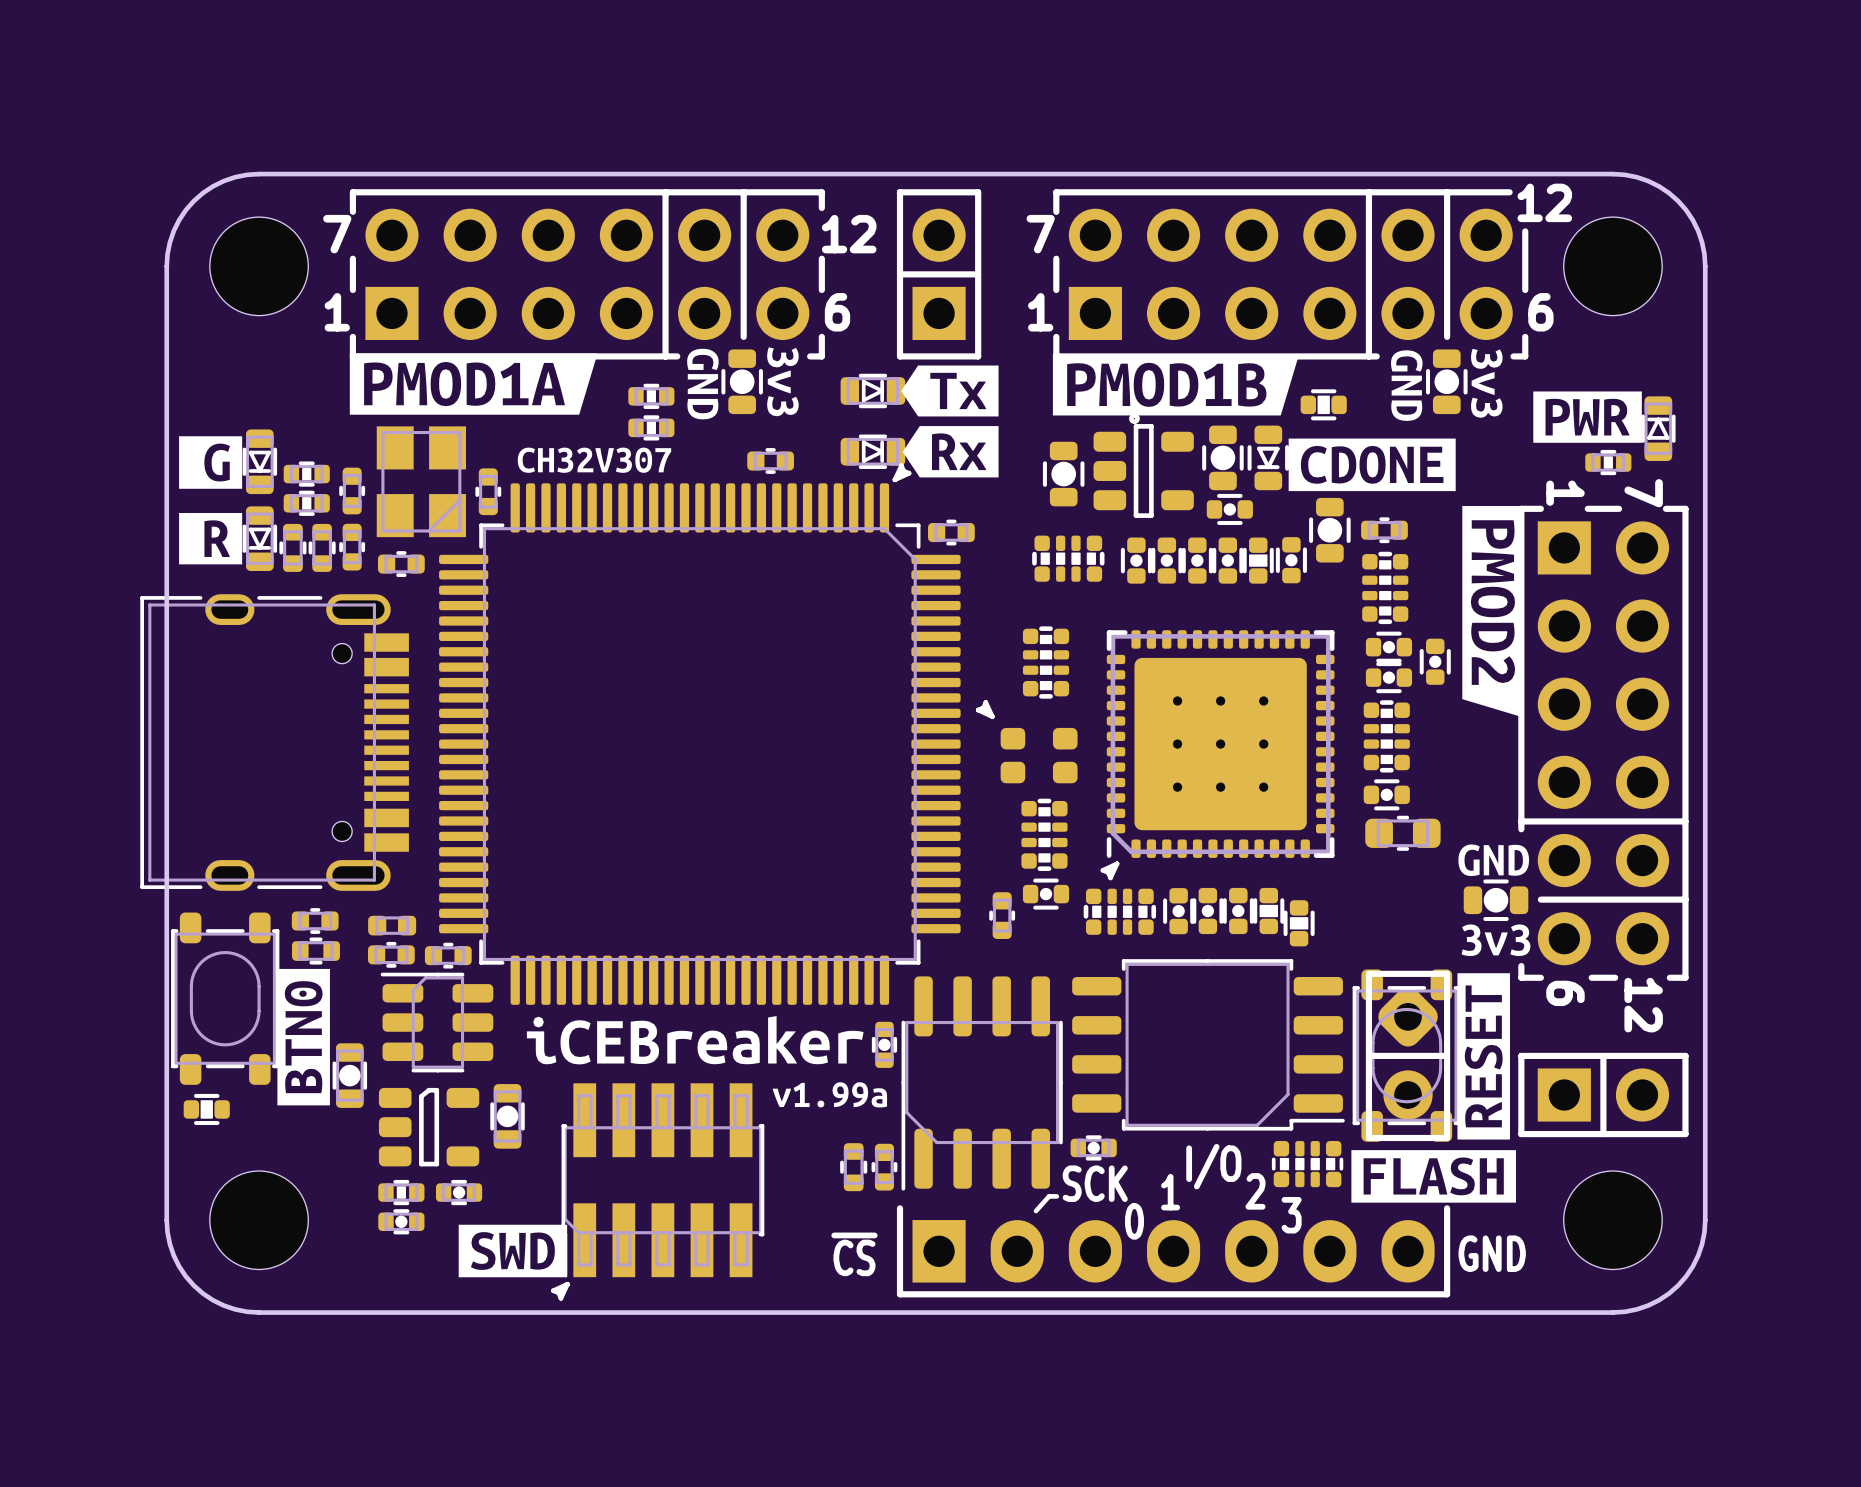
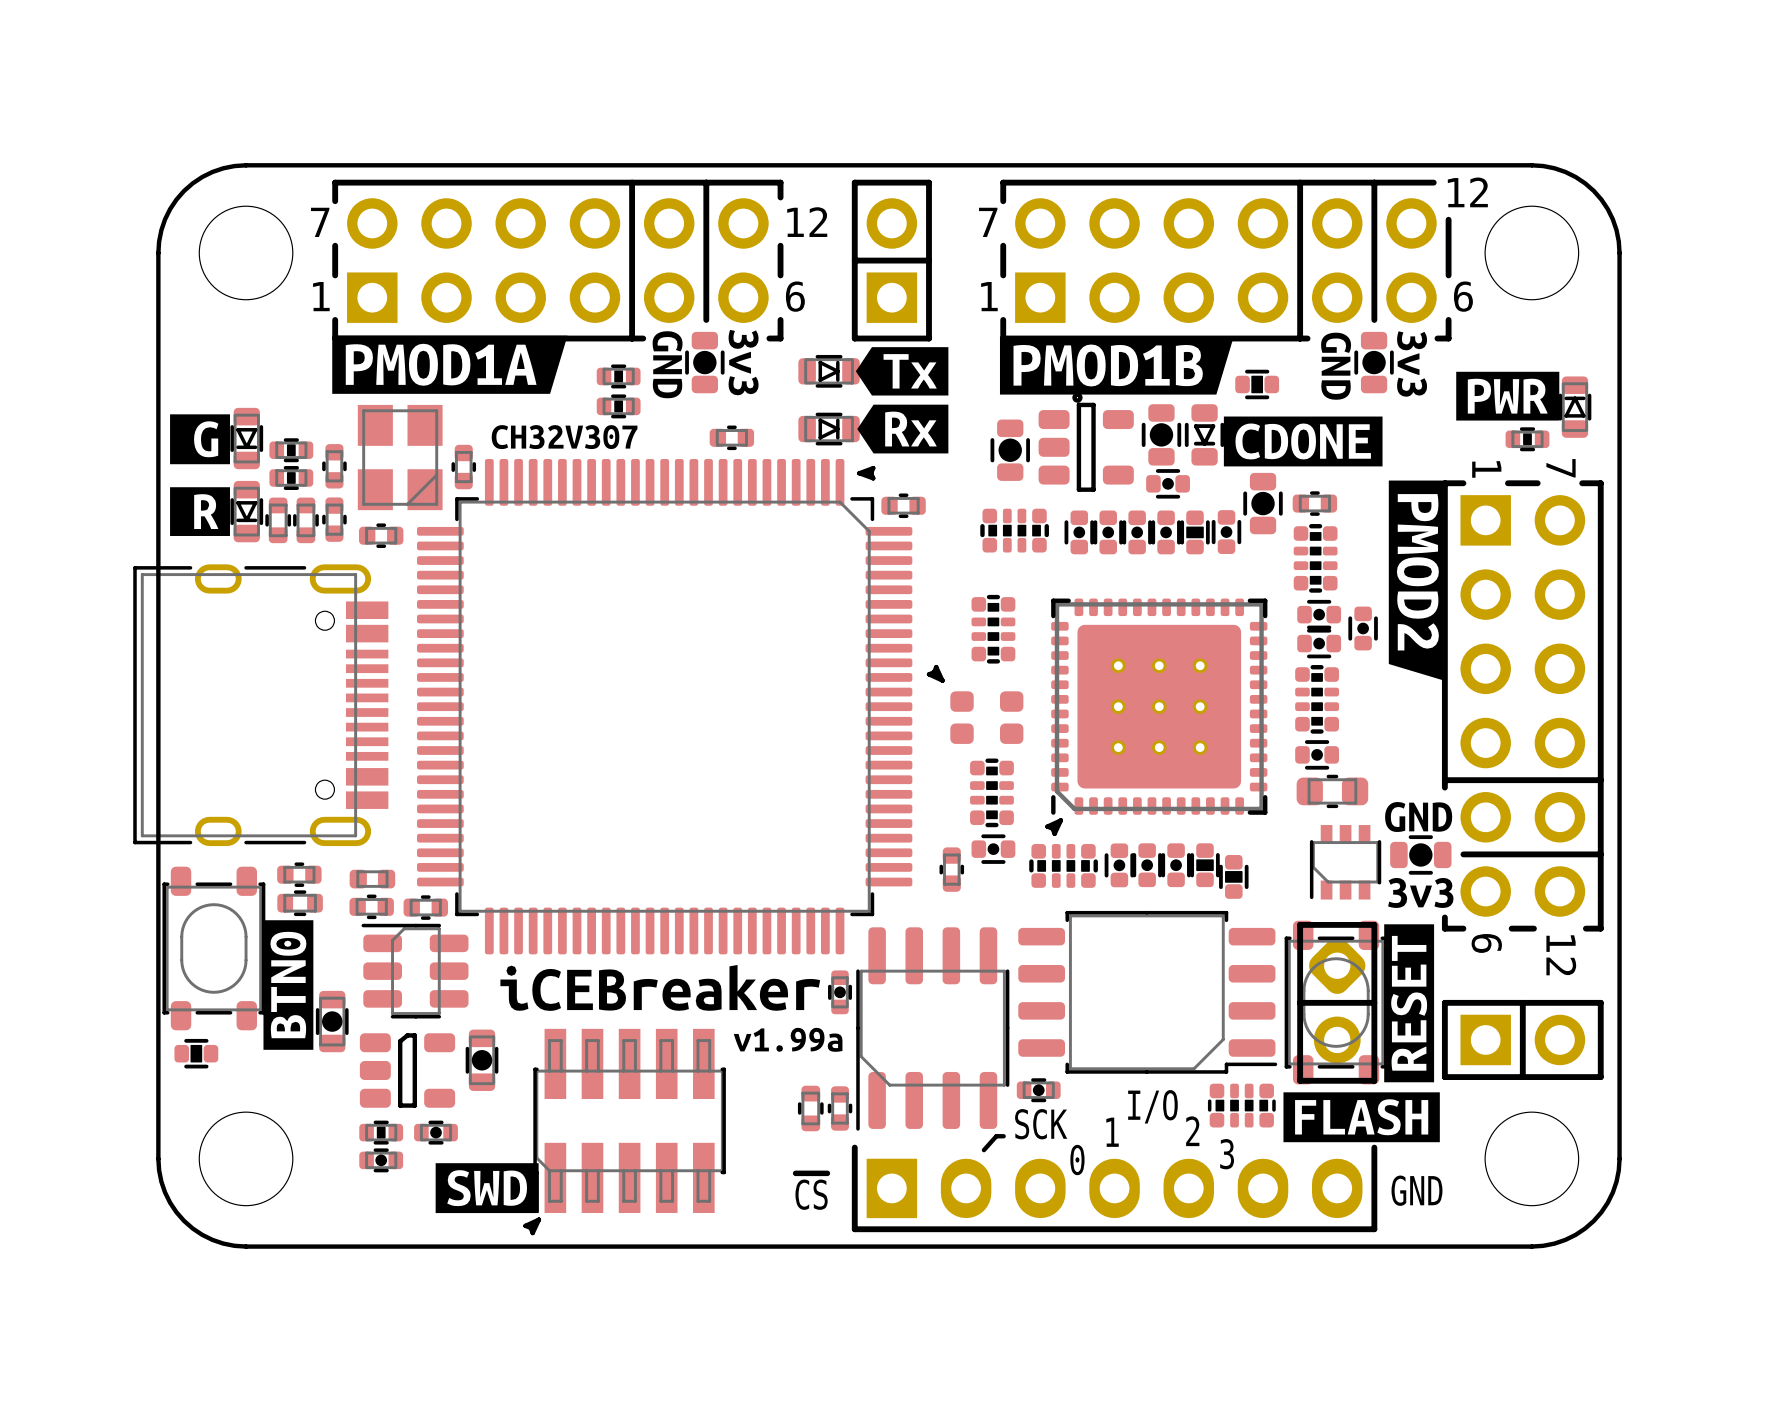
part footprint: [439, 463, 961, 1005] -> [417, 459, 913, 955]
part: none -> (1345, 862)

